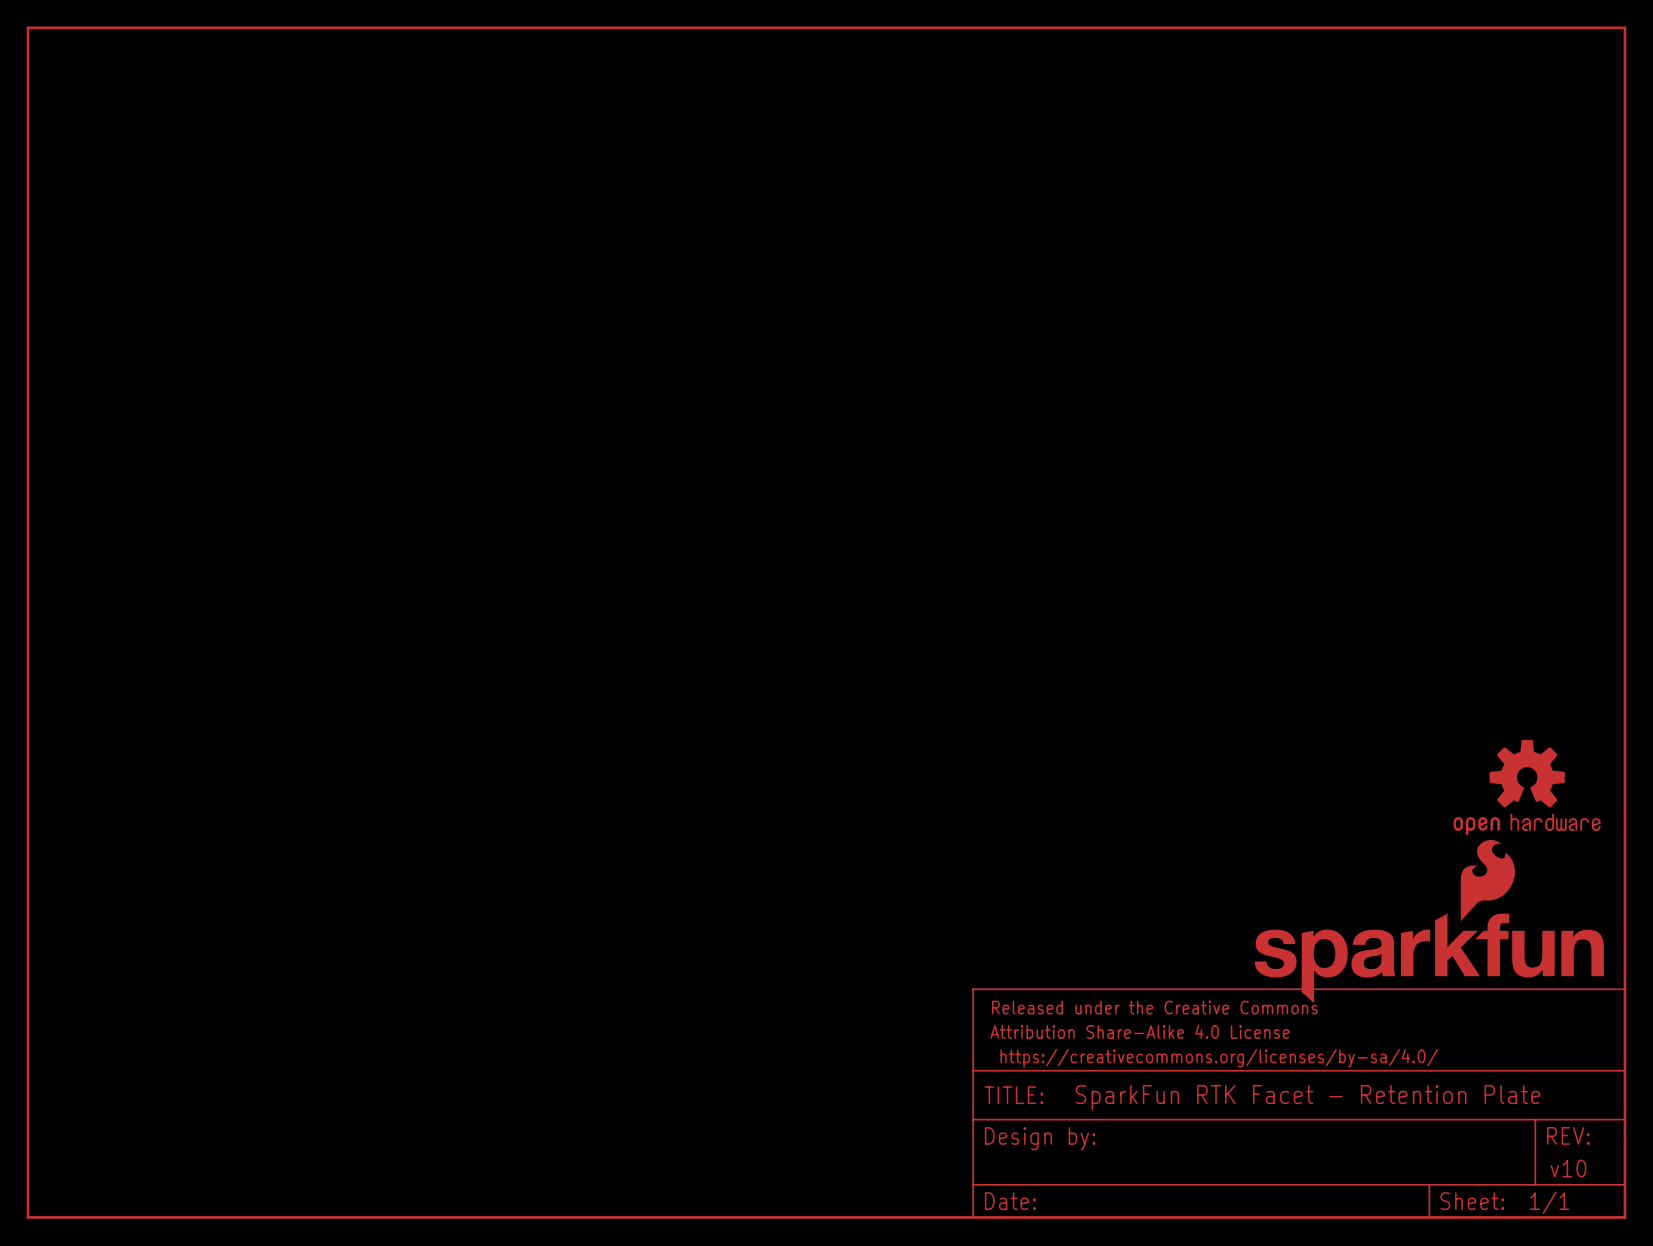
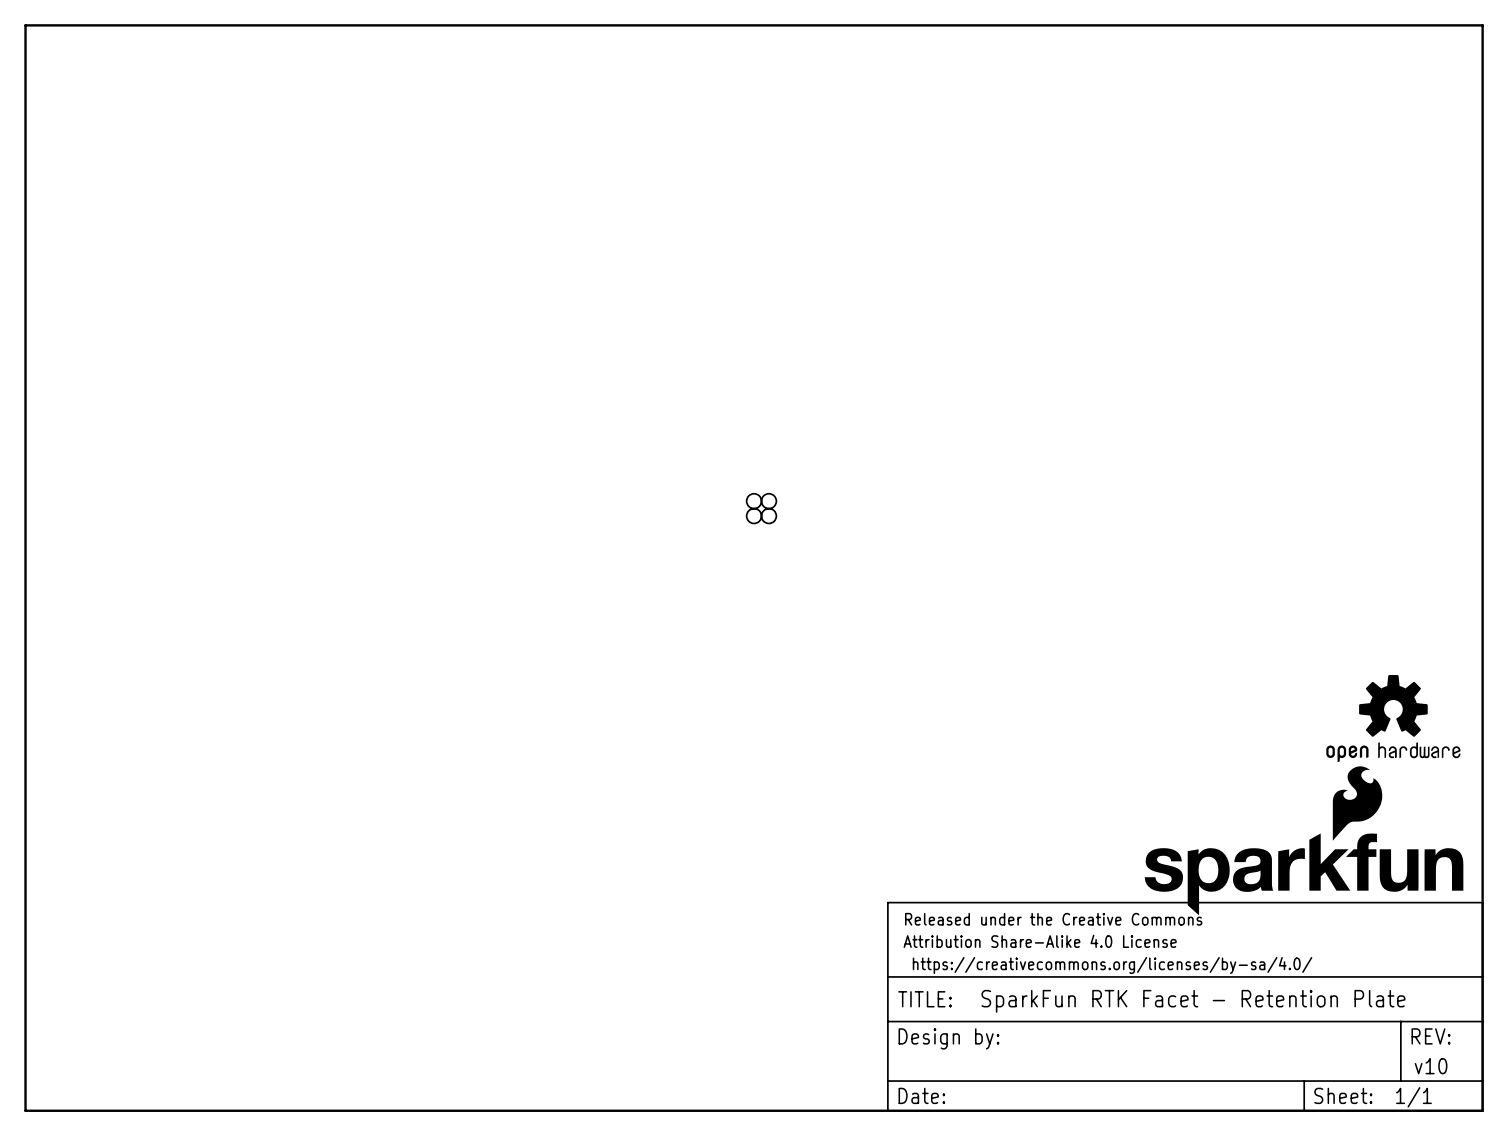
part: none -> (754, 501)
part: none -> (768, 501)
part: none -> (754, 516)
part: none -> (768, 516)

